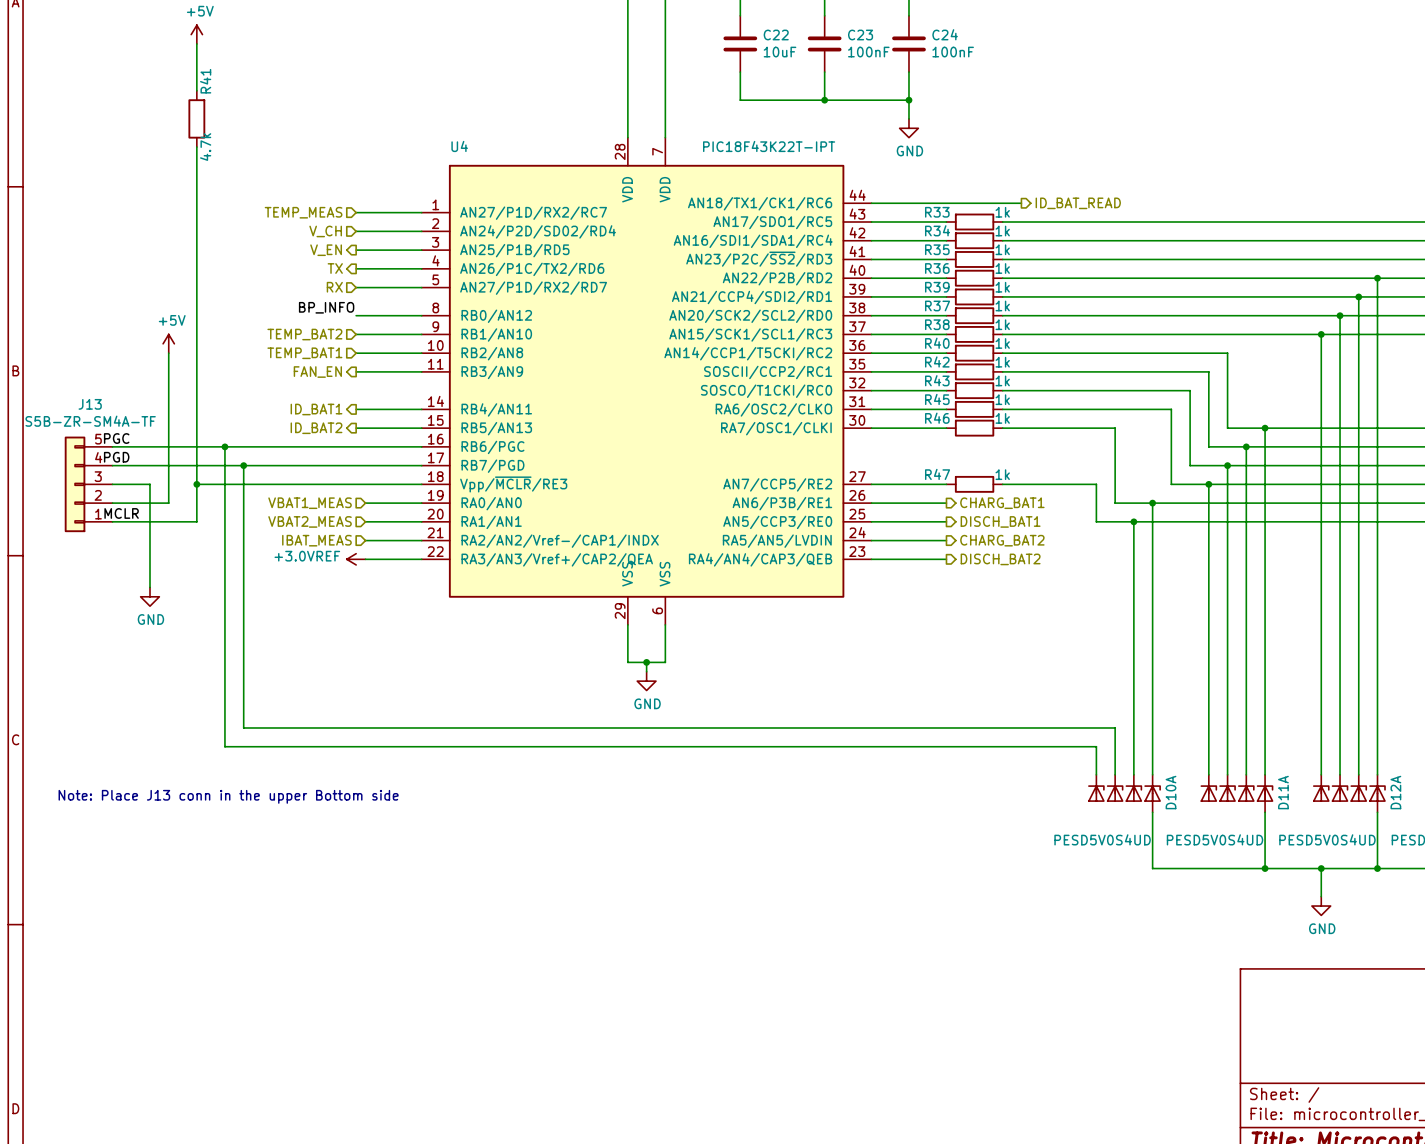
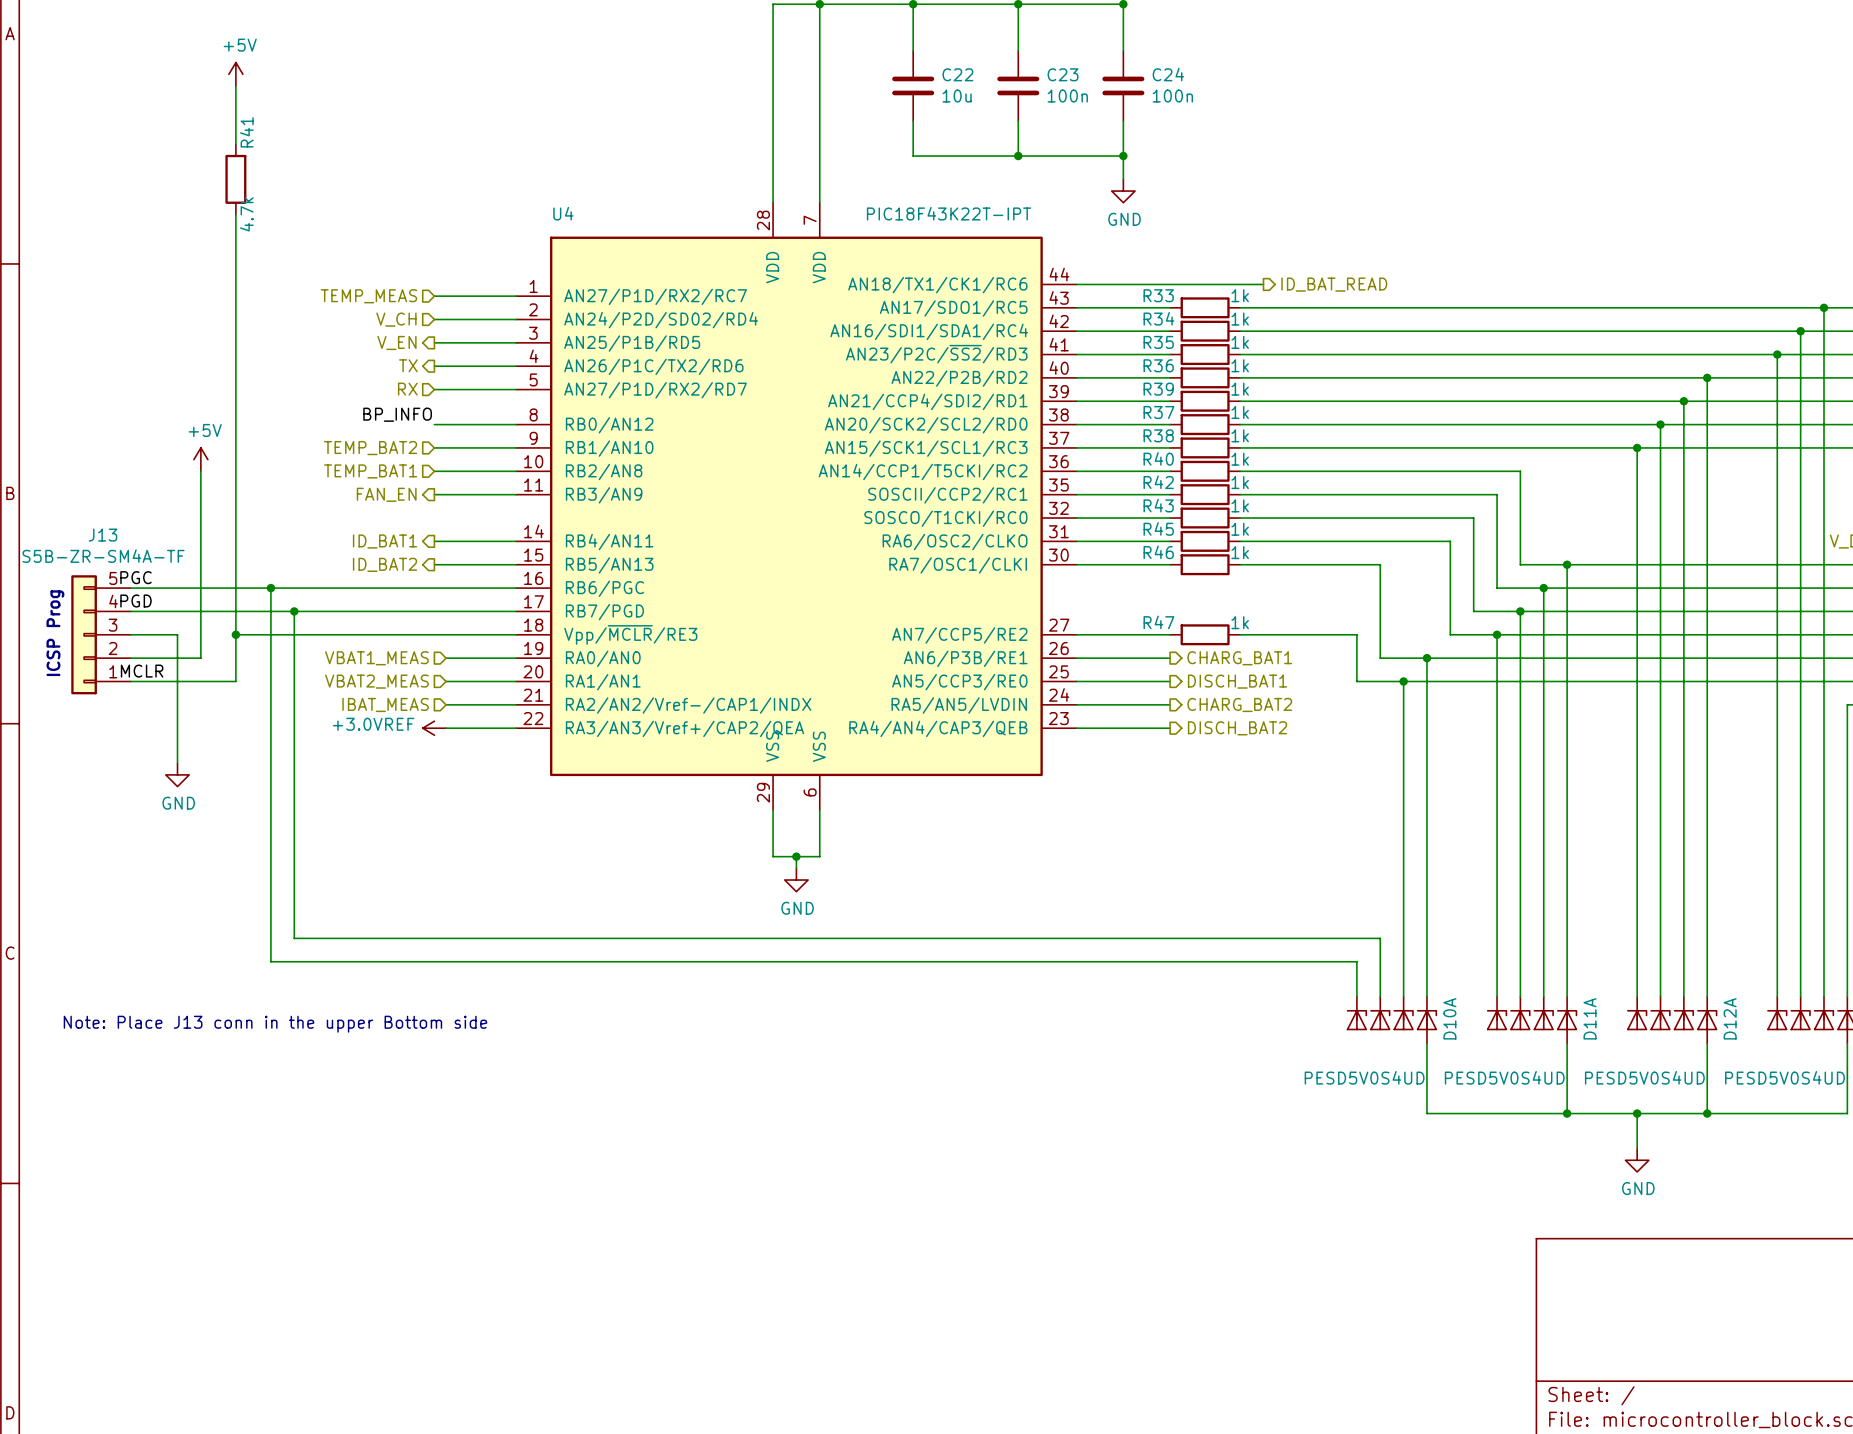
C22 value: 10uF (780, 52) -> 10u (957, 96)
C23 value: 100nF (868, 52) -> 100n (1067, 96)
C24 value: 100nF (953, 52) -> 100n (1172, 96)
text: none -> ICSP Prog (55, 633)

